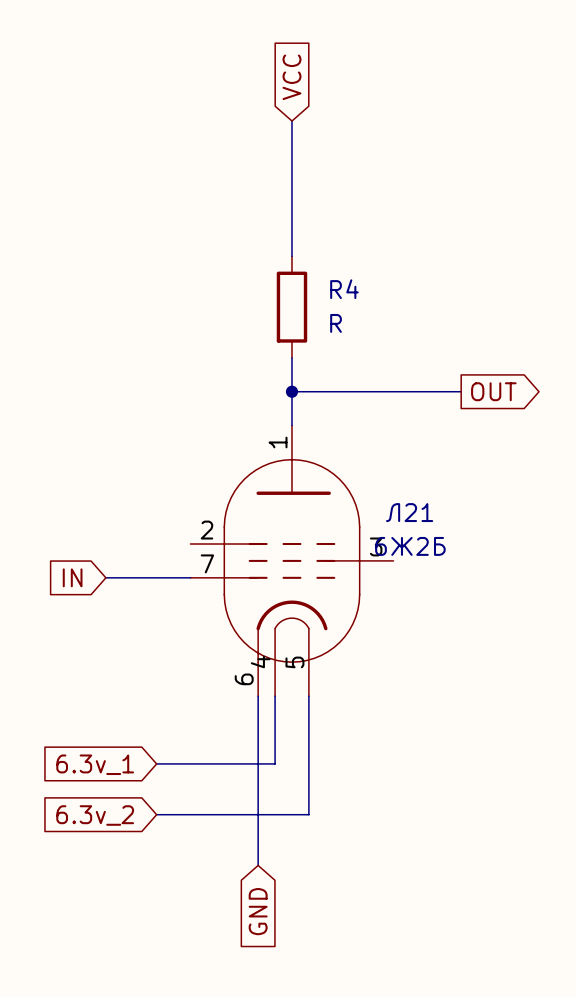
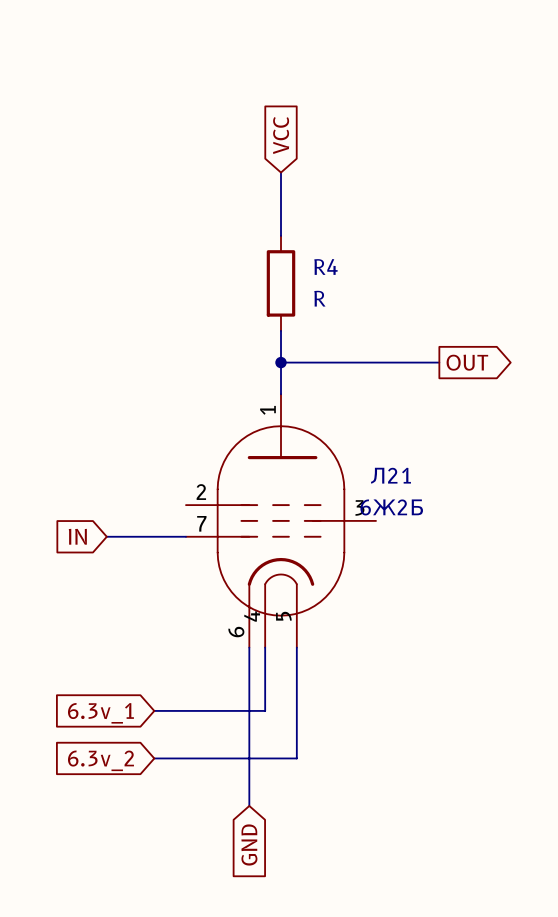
global label position: VCC (291, 77) -> VCC (281, 135)
wire: (291, 121) (291, 188) -> none

